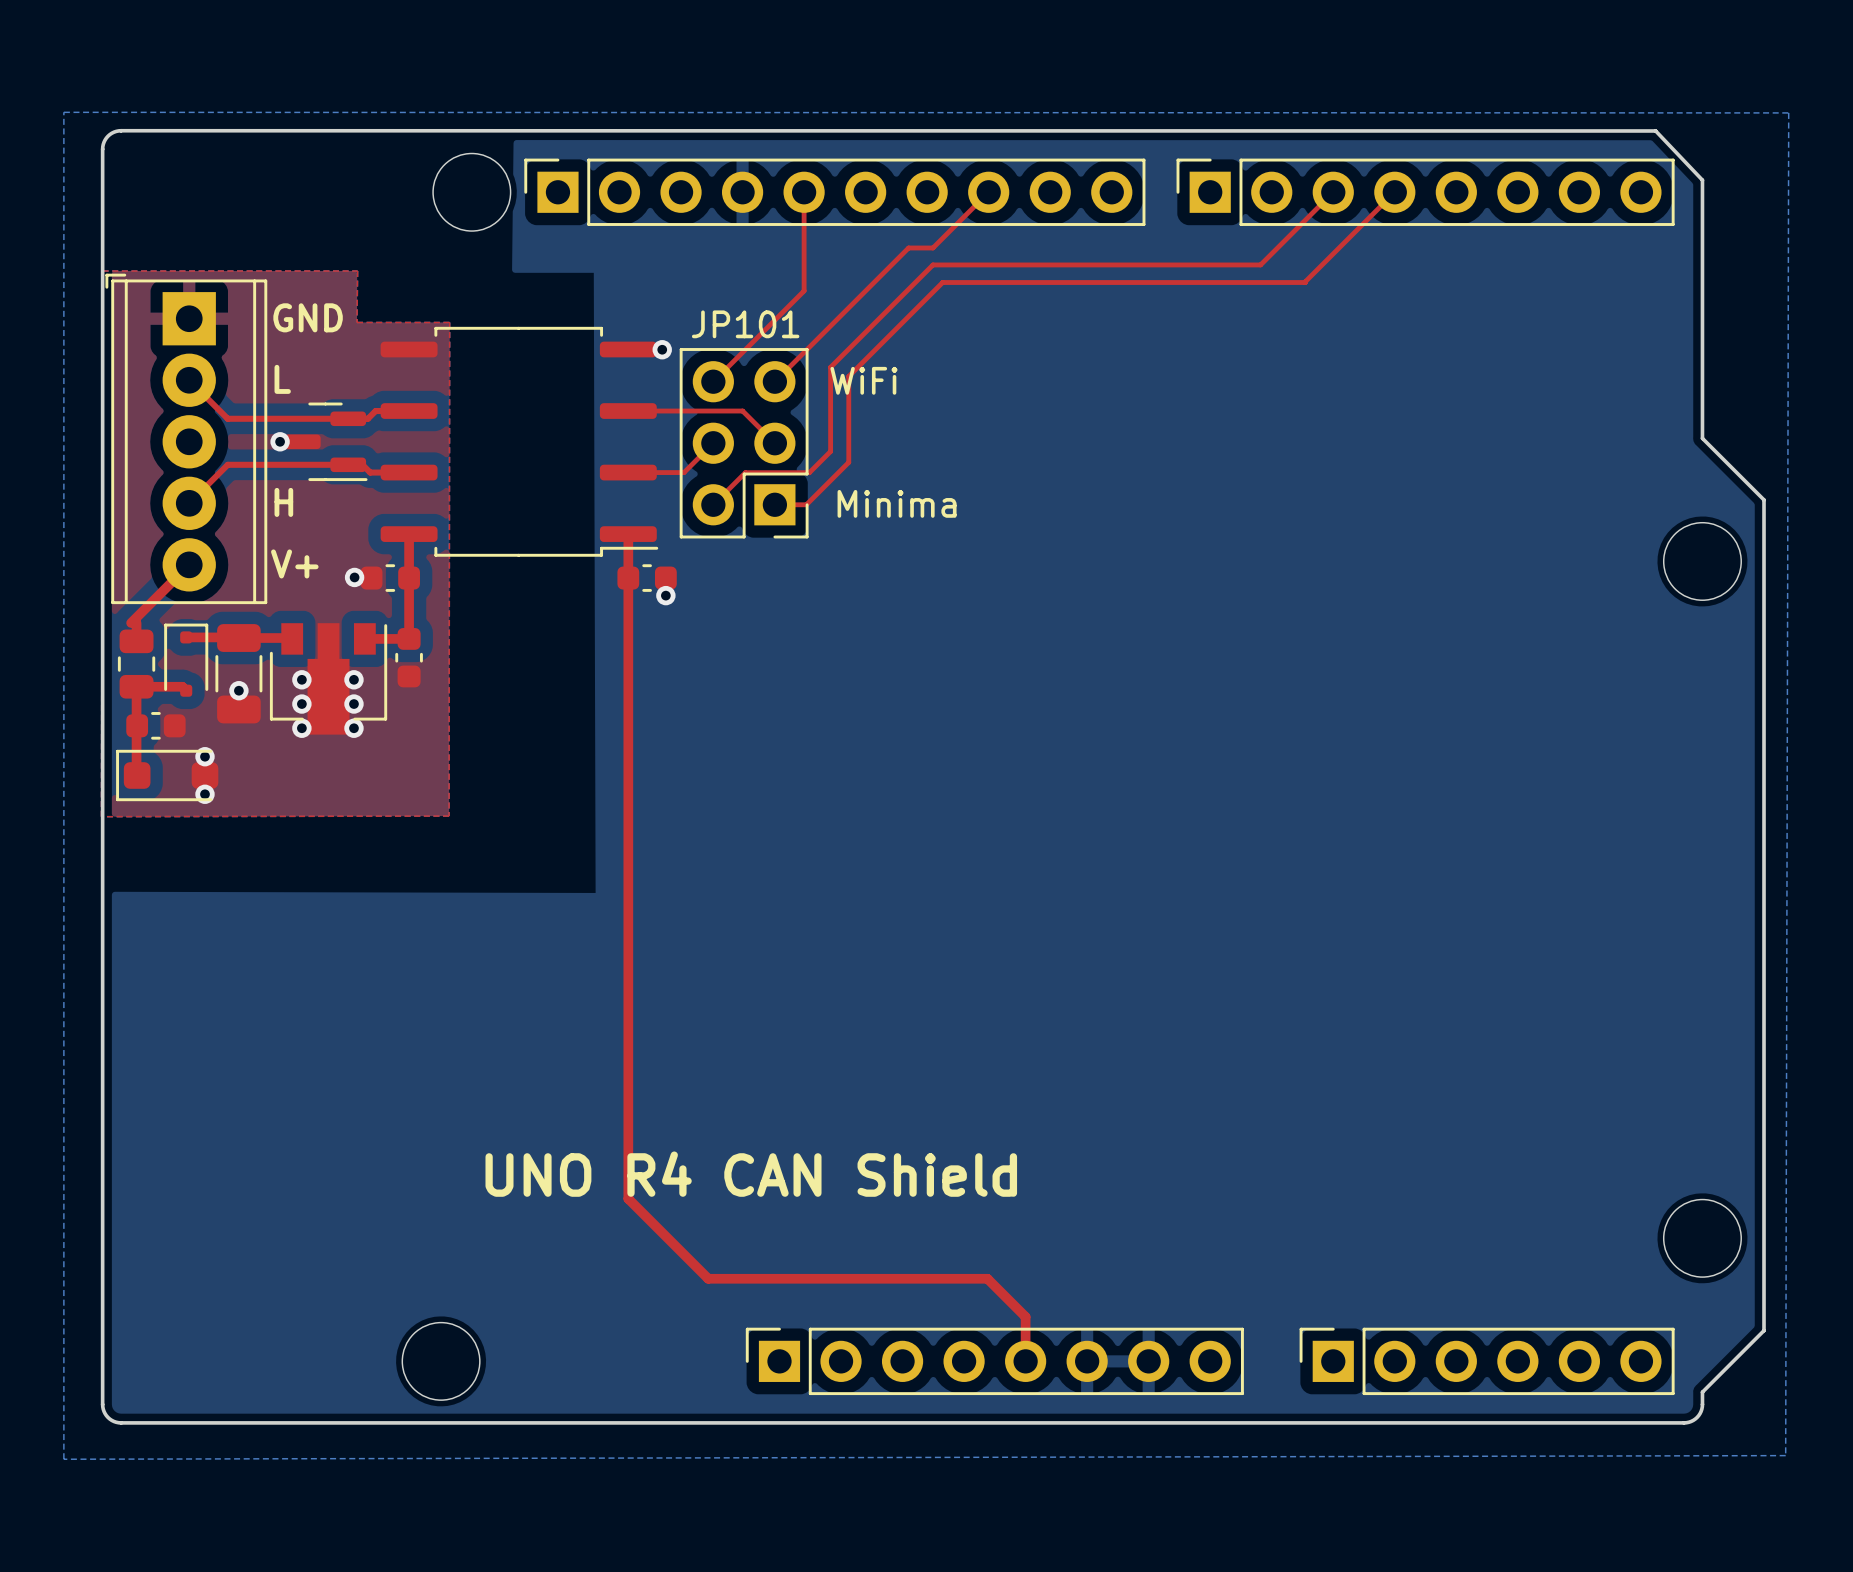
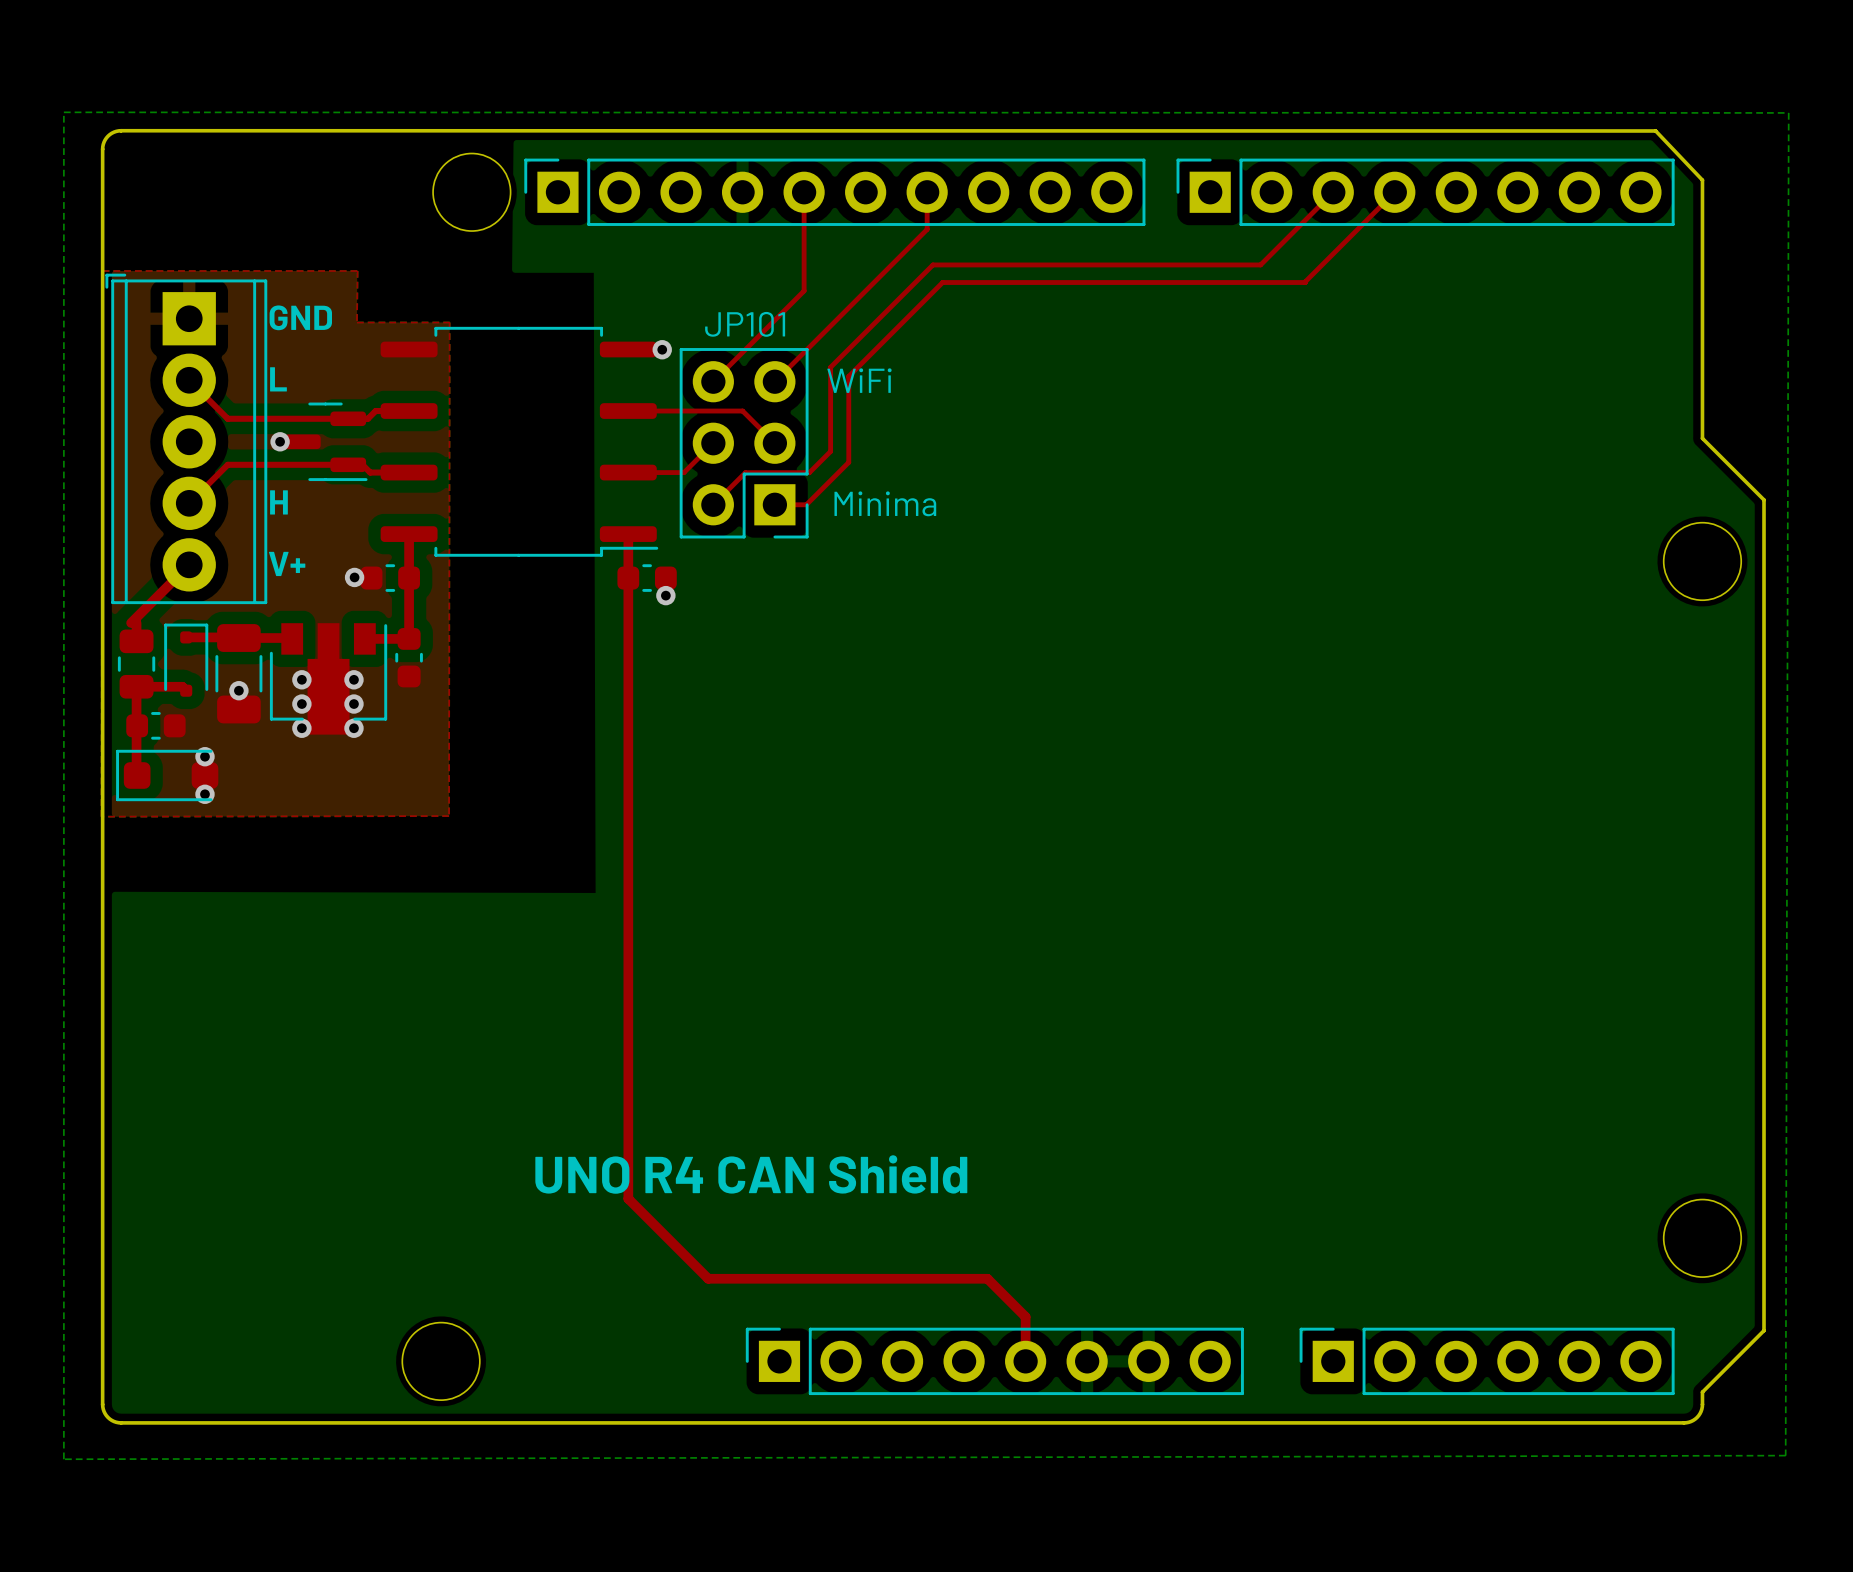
top track: (988, 192) (932, 247) (908, 247) -> (927, 192) (927, 229) (908, 247)

